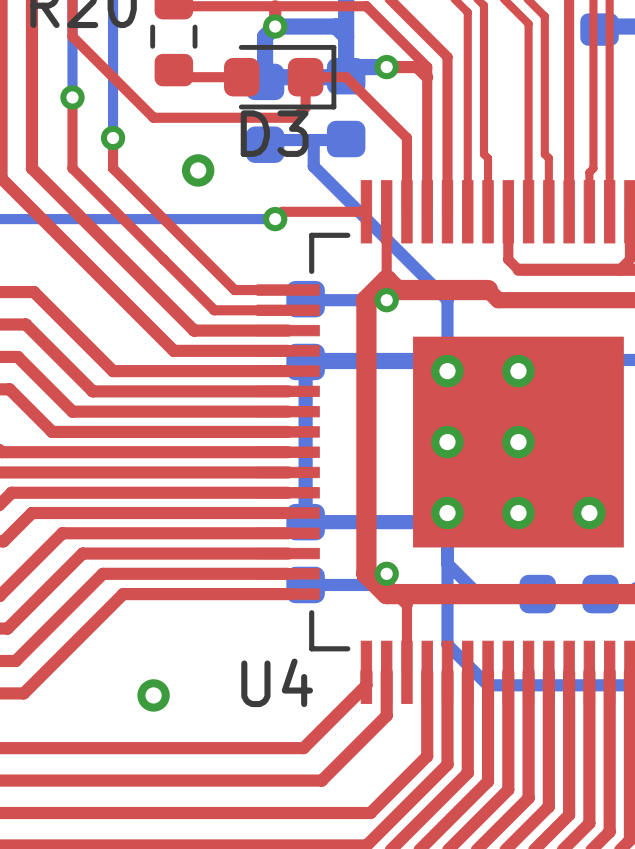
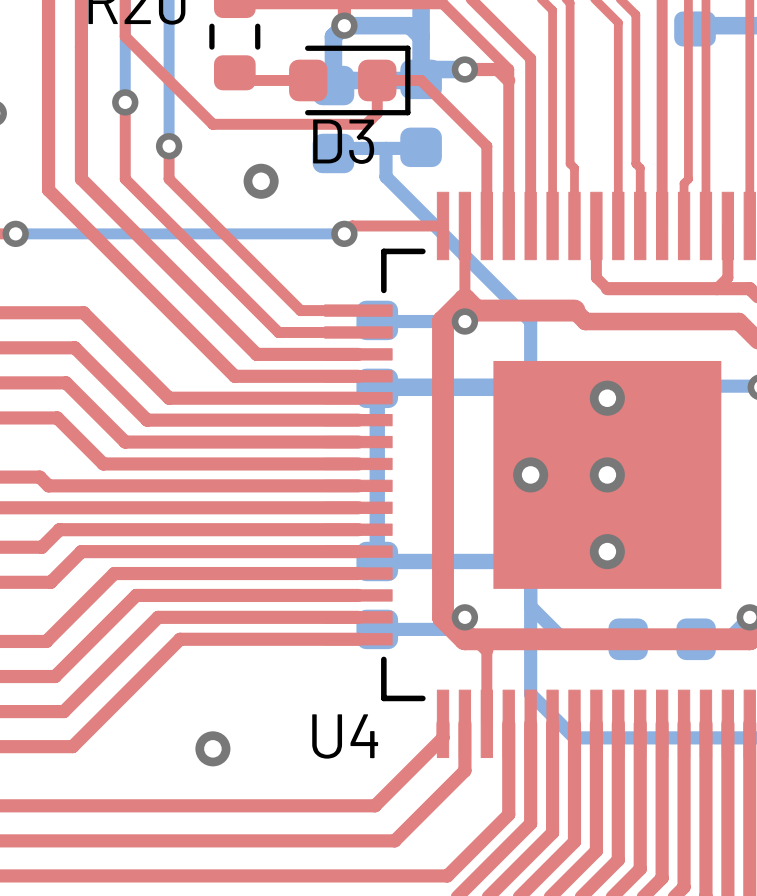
via: (447, 371) -> none
via: (447, 513) -> none
via: (589, 513) -> none

